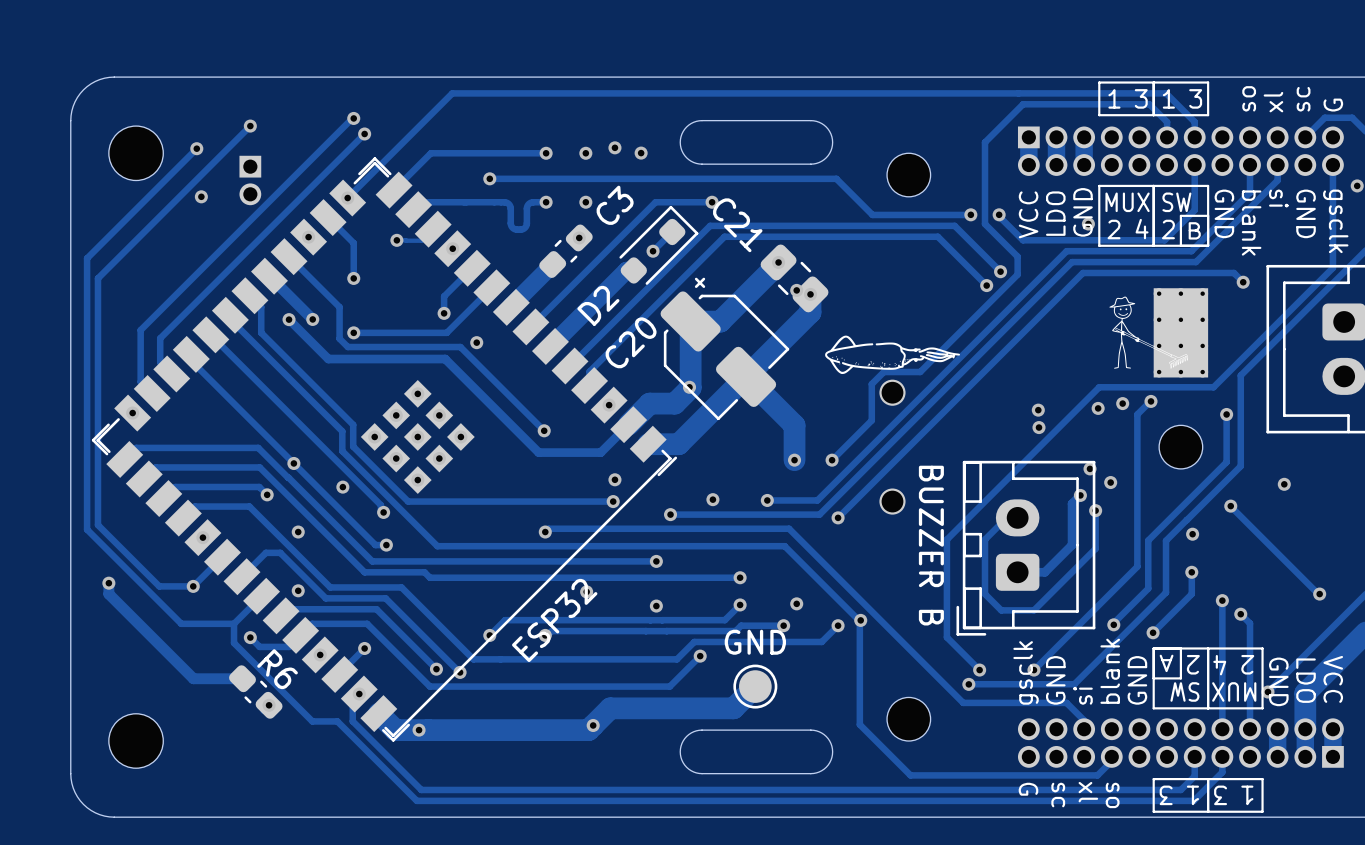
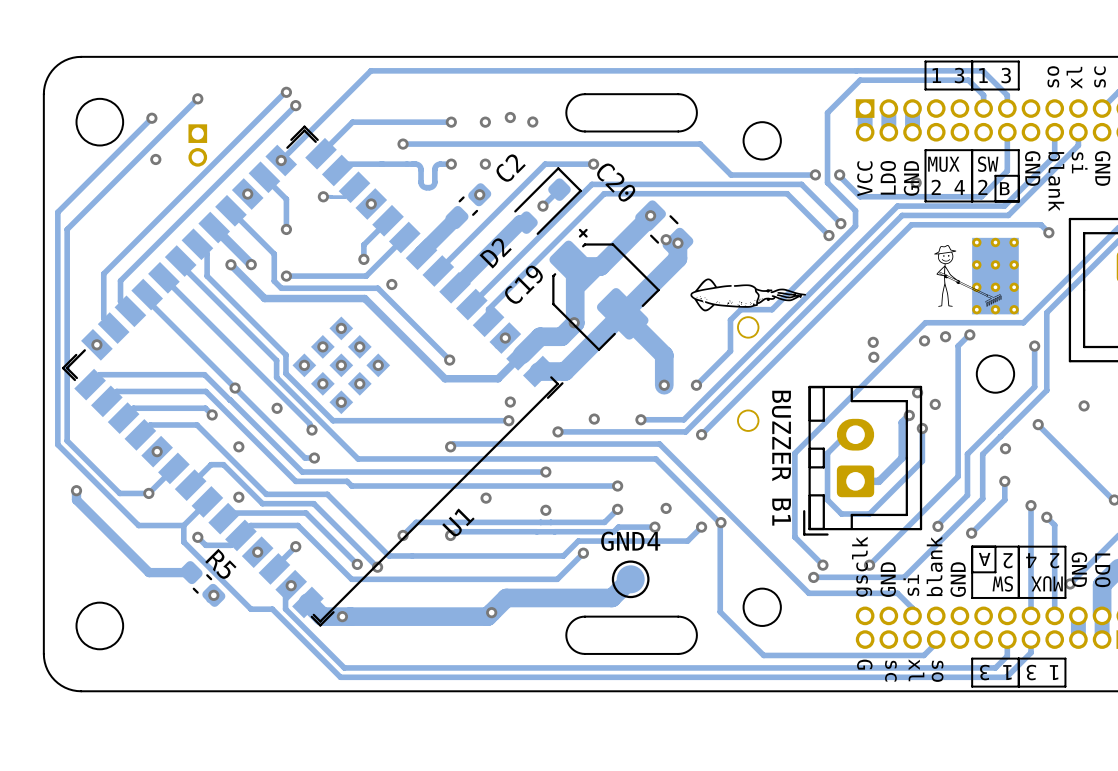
C3 name: C3 (615, 205) -> C2 (510, 168)
C21 name: C21 (737, 225) -> C20 (616, 182)
C20 name: C20 (631, 342) -> C19 (523, 284)
BUZZER B name: BUZZER B (931, 545) -> BUZZER B1 (781, 458)
ESP32 name: ESP32 (554, 620) -> U1 (458, 522)
GND name: GND (755, 642) -> GND4 (630, 541)
R6 name: R6 (277, 669) -> R5 (220, 563)

